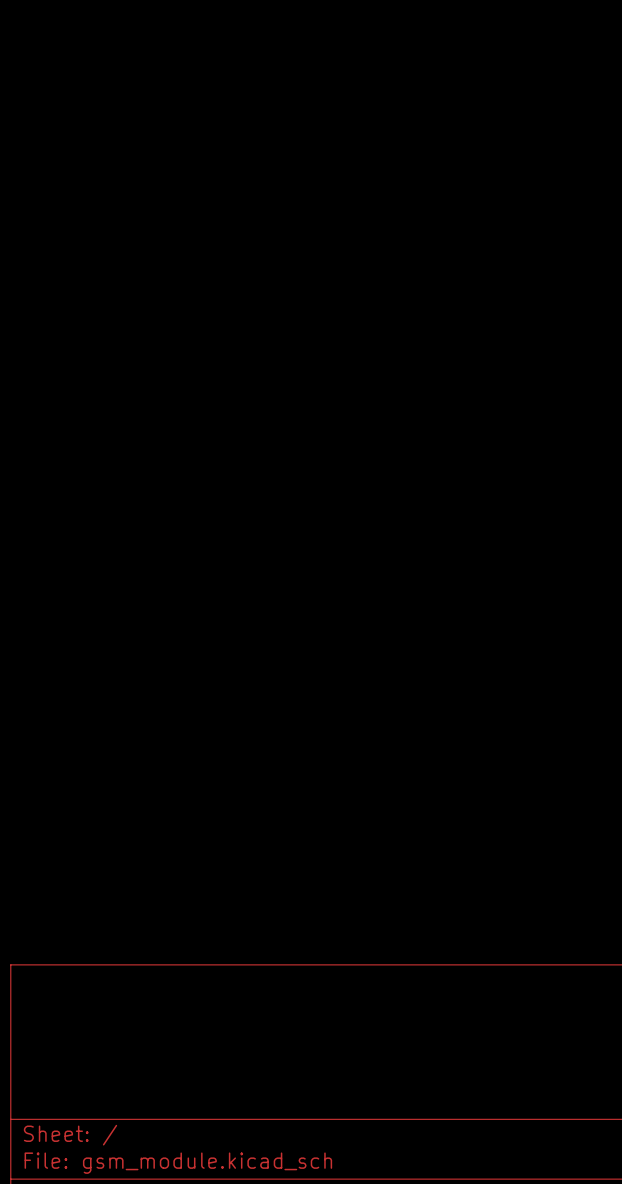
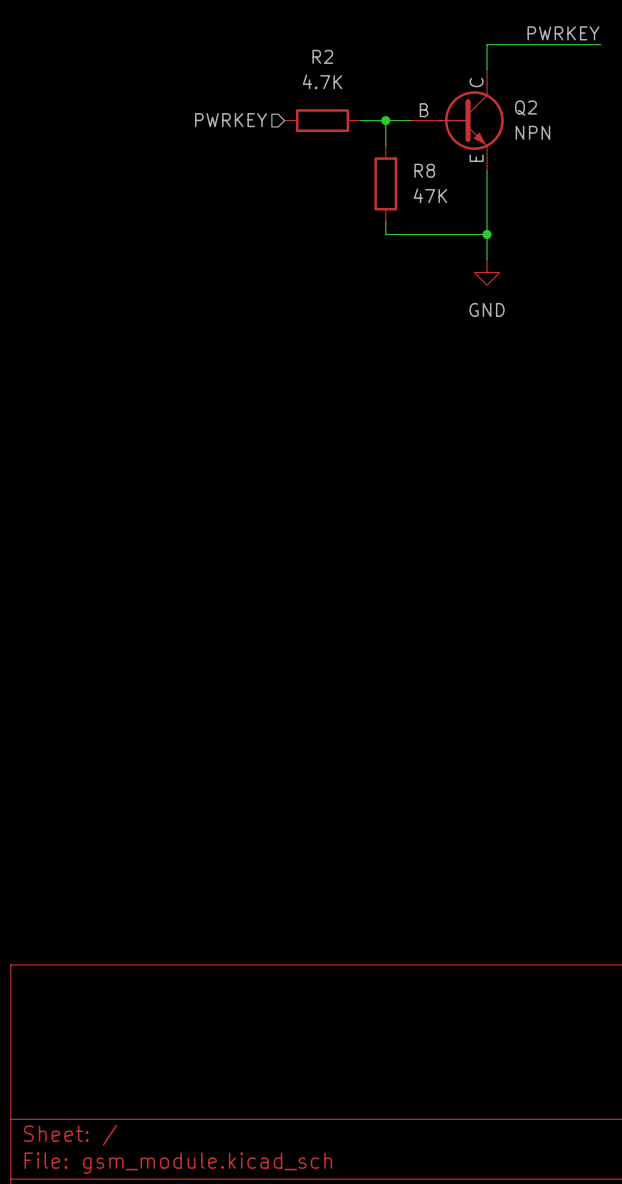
label: none -> PWRKEY (563, 33)
wire: none -> (600, 44) (487, 44) (487, 69)
hierarchical label: none -> PWRKEY (231, 120)
R2: none -> 4.7K (322, 120)
wire: none -> (360, 120) (411, 120)
wire: none -> (385, 120) (385, 145)
junction: none -> (385, 120)
Q2: none -> NPN (457, 120)
wire: none -> (487, 171) (487, 259)
R8: none -> 47K (385, 183)
wire: none -> (385, 221) (385, 234) (487, 234)
junction: none -> (487, 234)
power symbol: none -> GND (487, 272)

